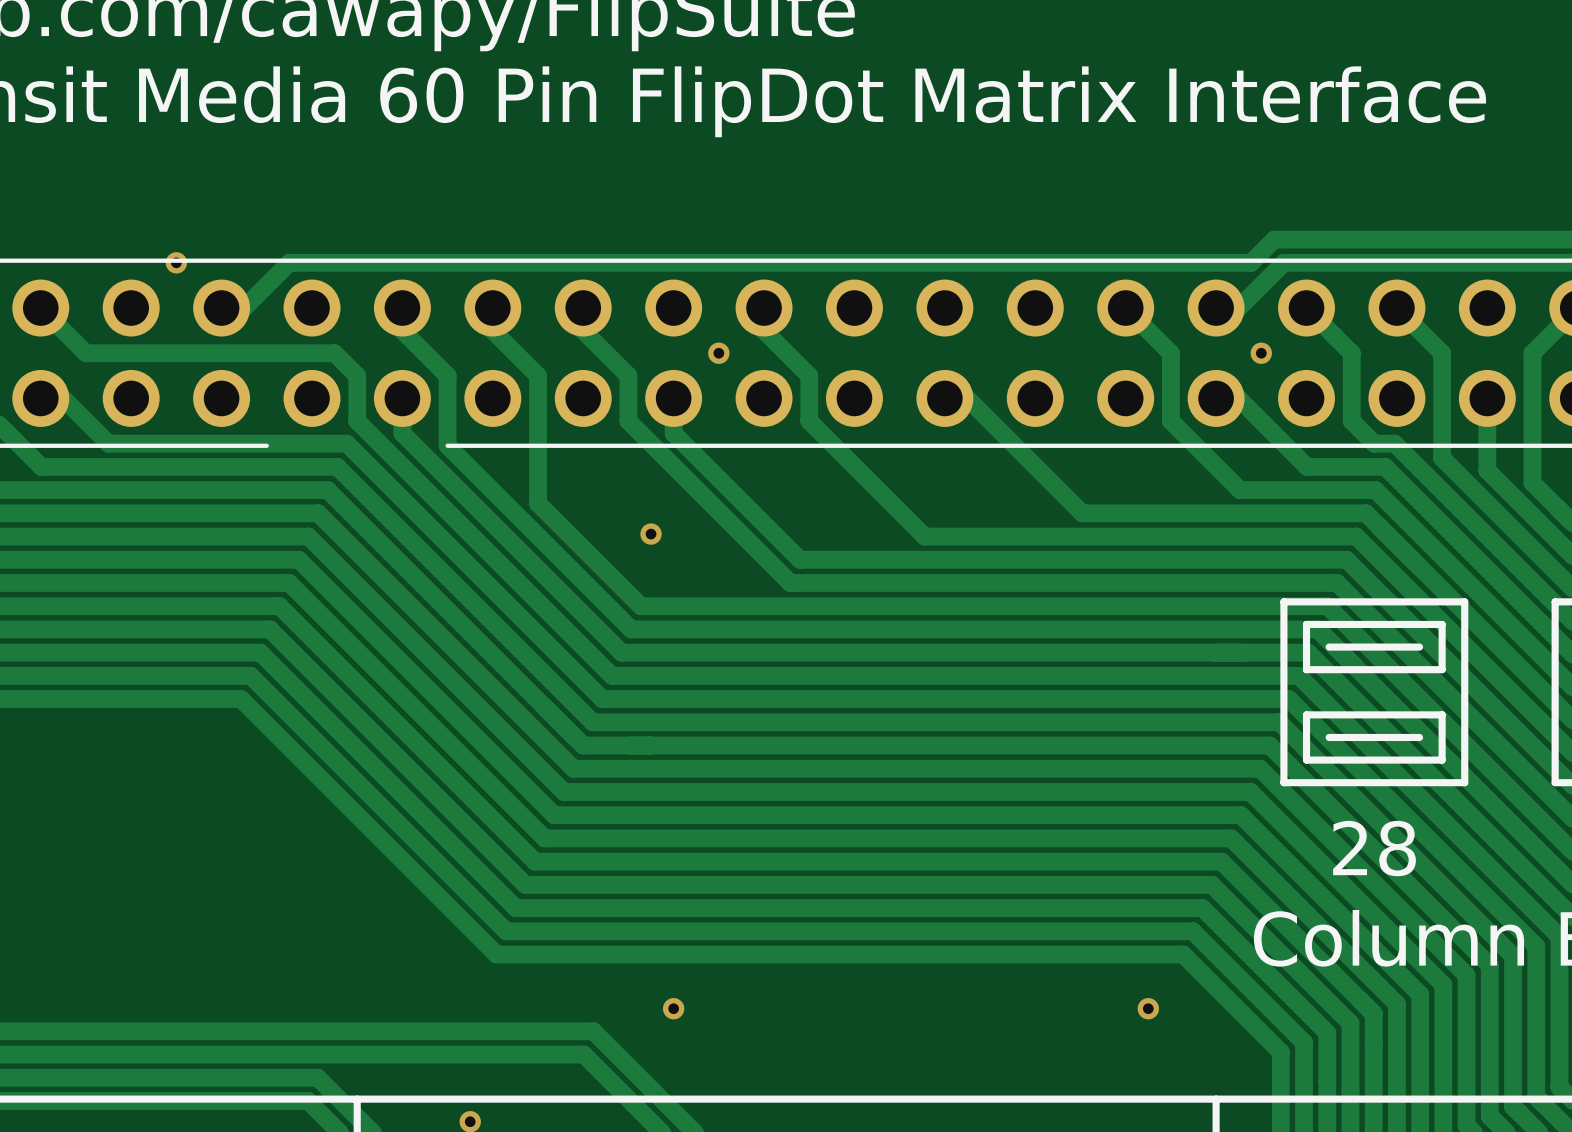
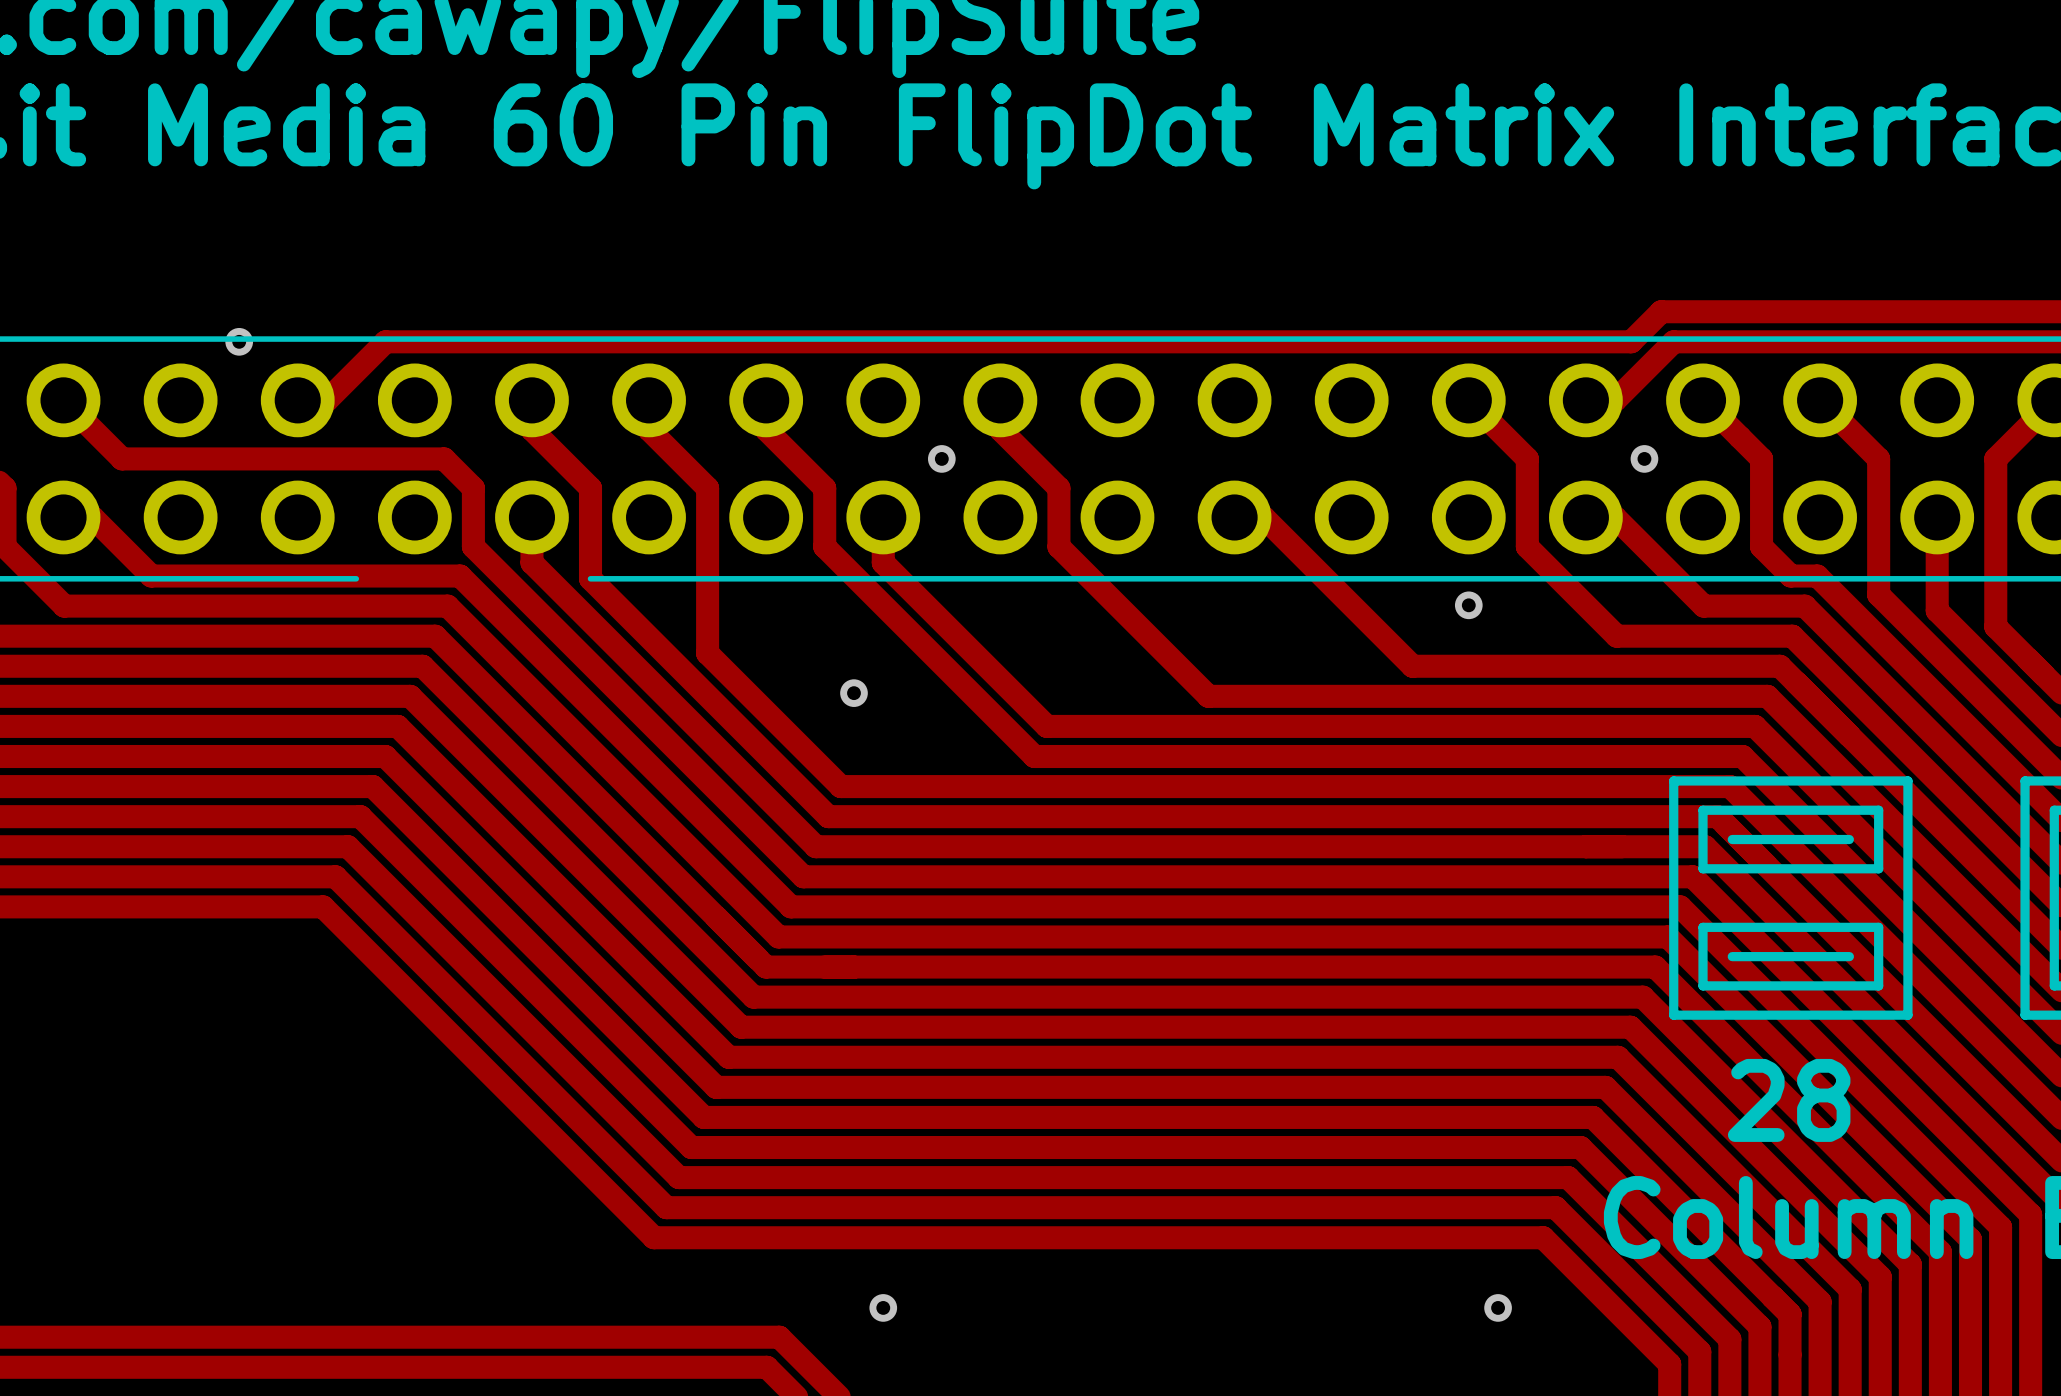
via: none -> (1468, 605)

